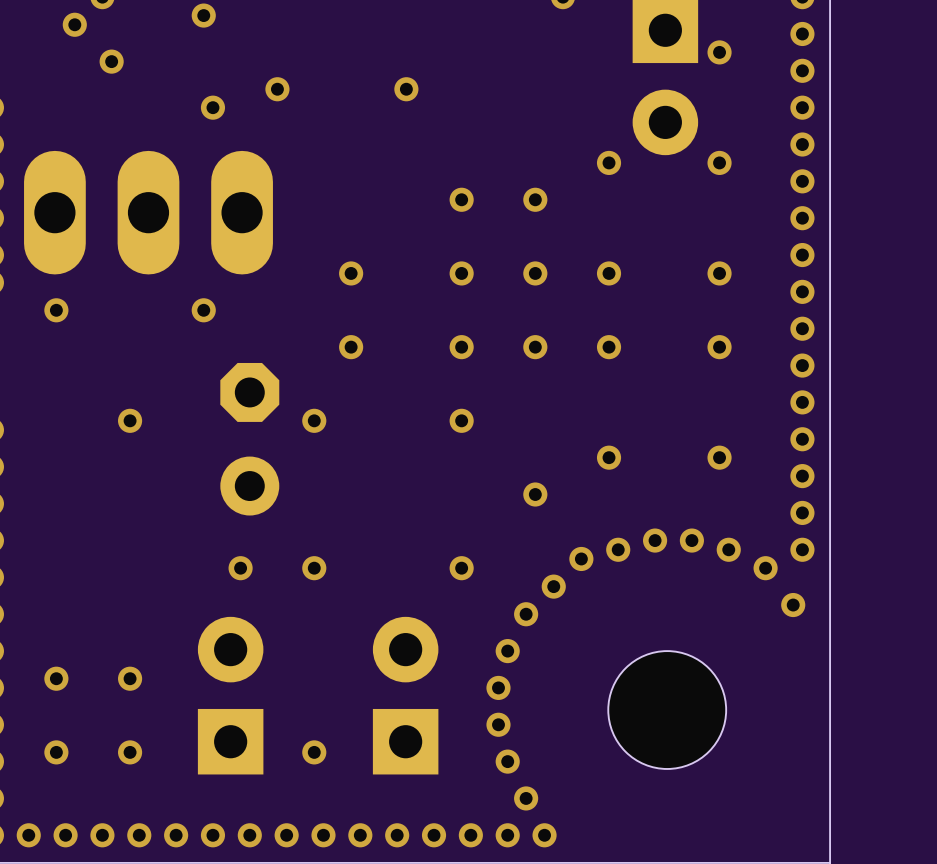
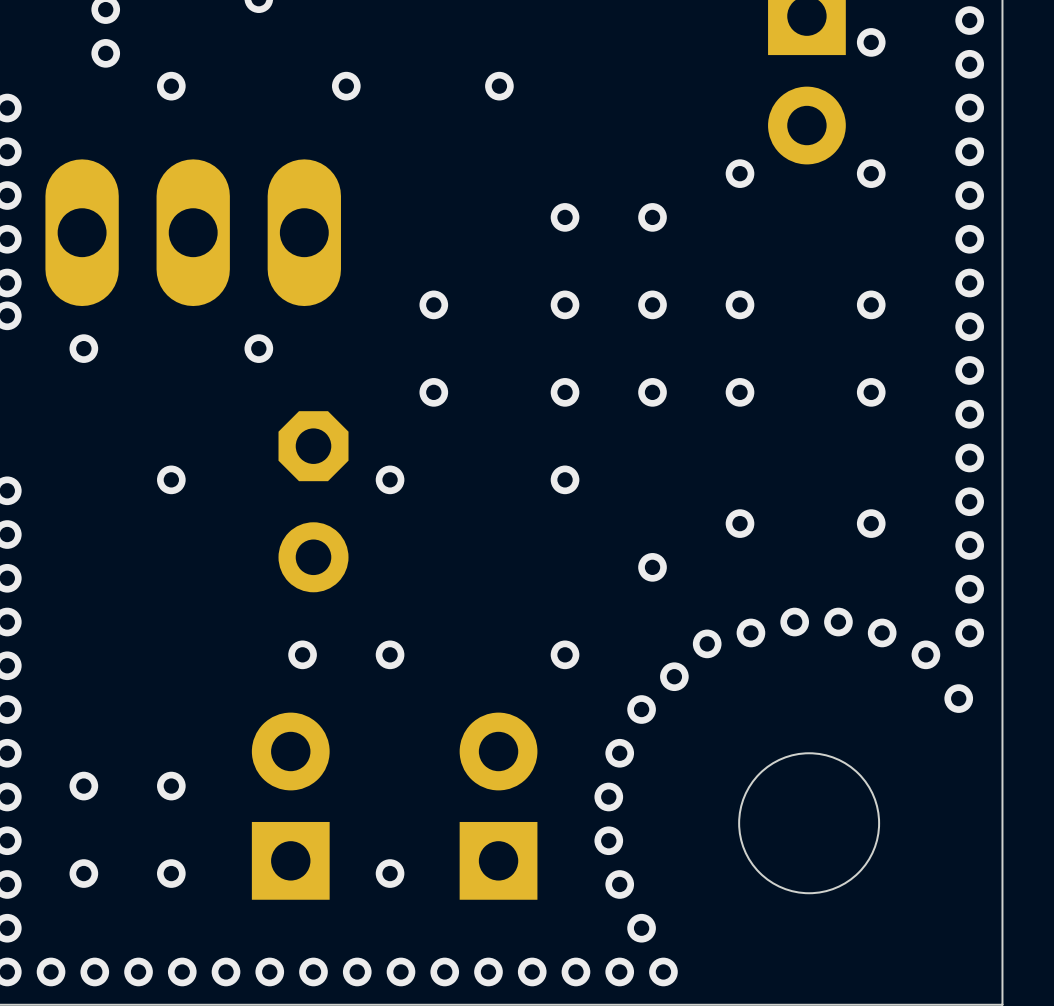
via: none -> (105, 53)
via: (111, 61) -> none
via: none -> (171, 86)
via: (212, 107) -> none

